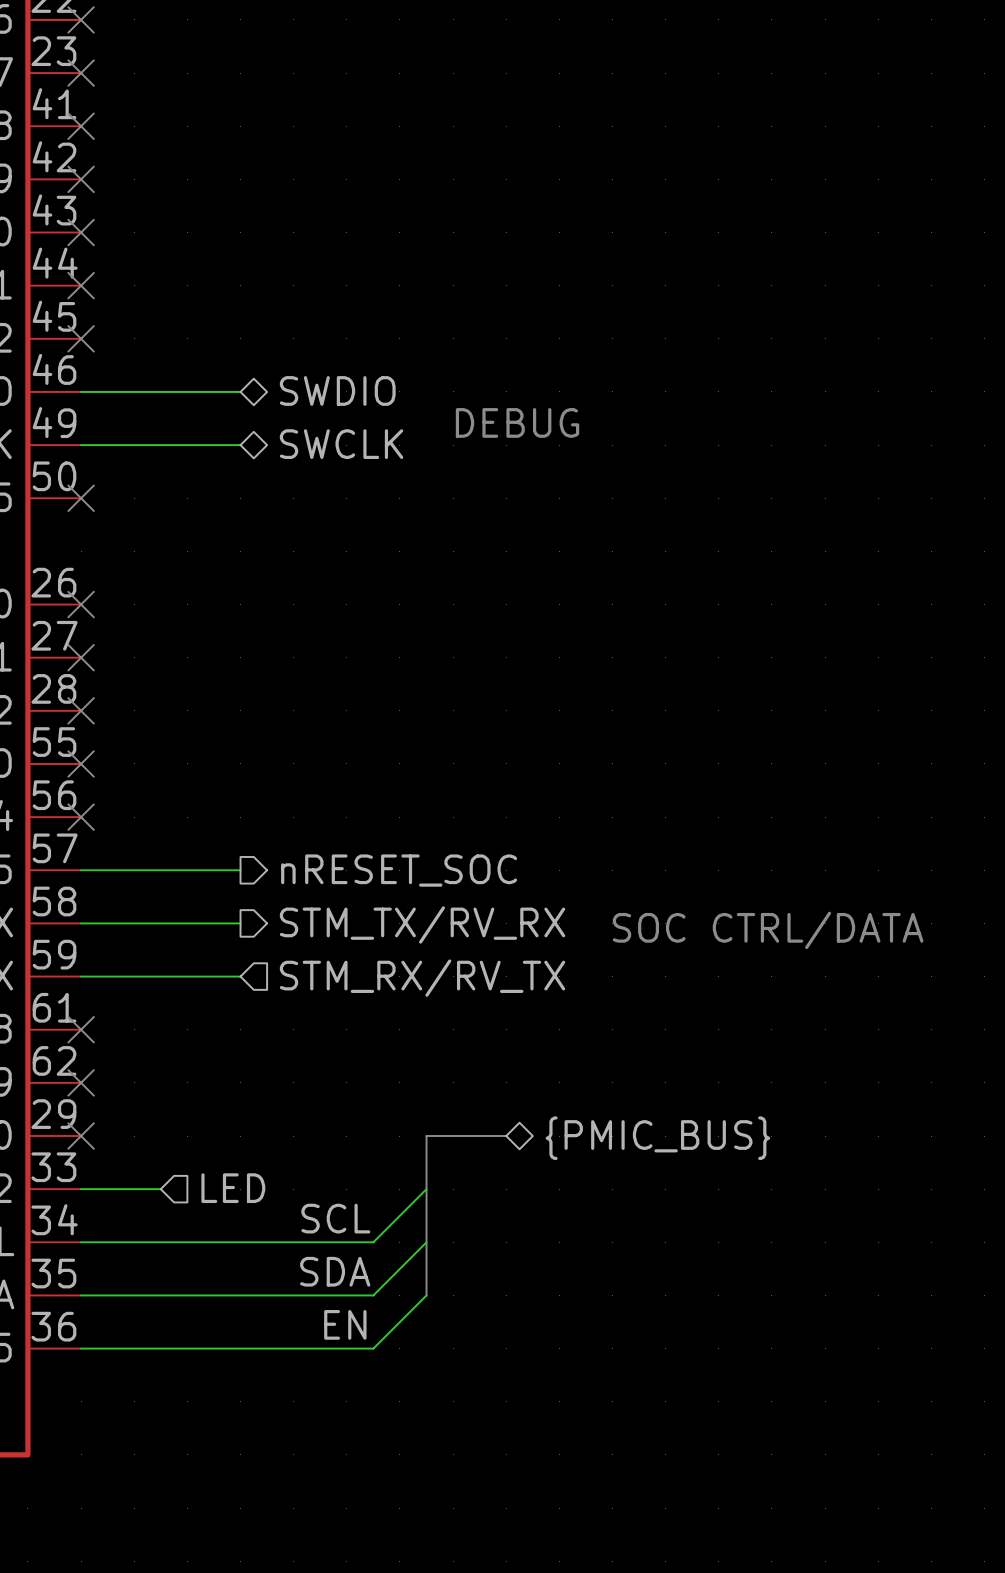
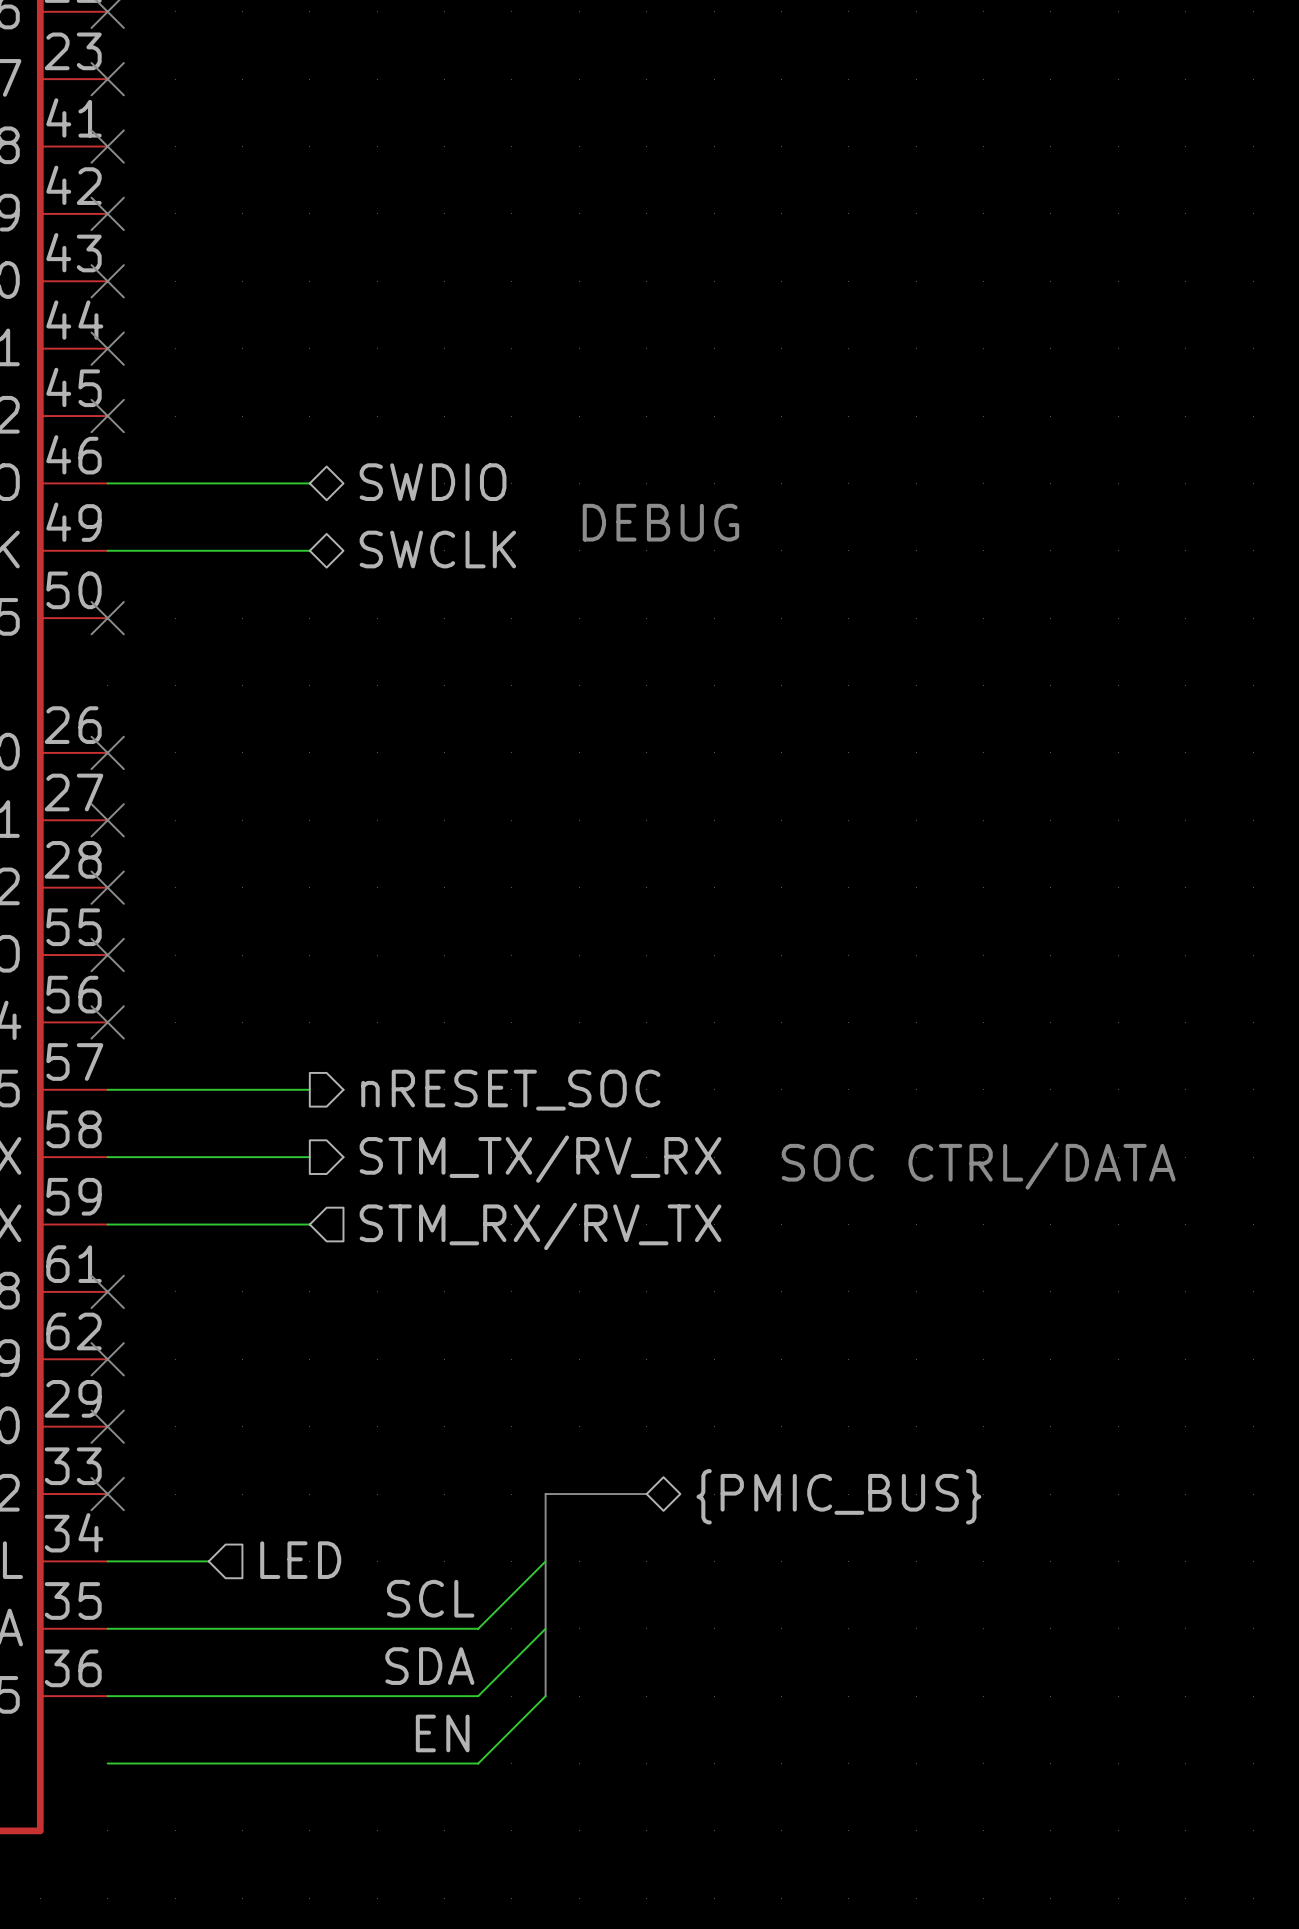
bus: (506, 1136) (426, 1136) (426, 1189) -> (646, 1494) (545, 1494)
hierarchical label position: {PMIC_BUS} (657, 1138) -> {PMIC_BUS} (838, 1496)
hierarchical label position: LED (233, 1188) -> LED (300, 1560)
wire: (81, 1189) (160, 1189) -> none
no-connect mark: none -> (107, 1494)
wire: (426, 1189) (373, 1242) (160, 1242) -> none
label: SCL (335, 1218) -> none
label: SDA (335, 1271) -> SCL (430, 1598)
bus: none -> (545, 1628) (545, 1696)
label: EN (345, 1324) -> SDA (429, 1666)
wire: none -> (545, 1696) (478, 1763) (107, 1763)
label: none -> EN (442, 1733)

